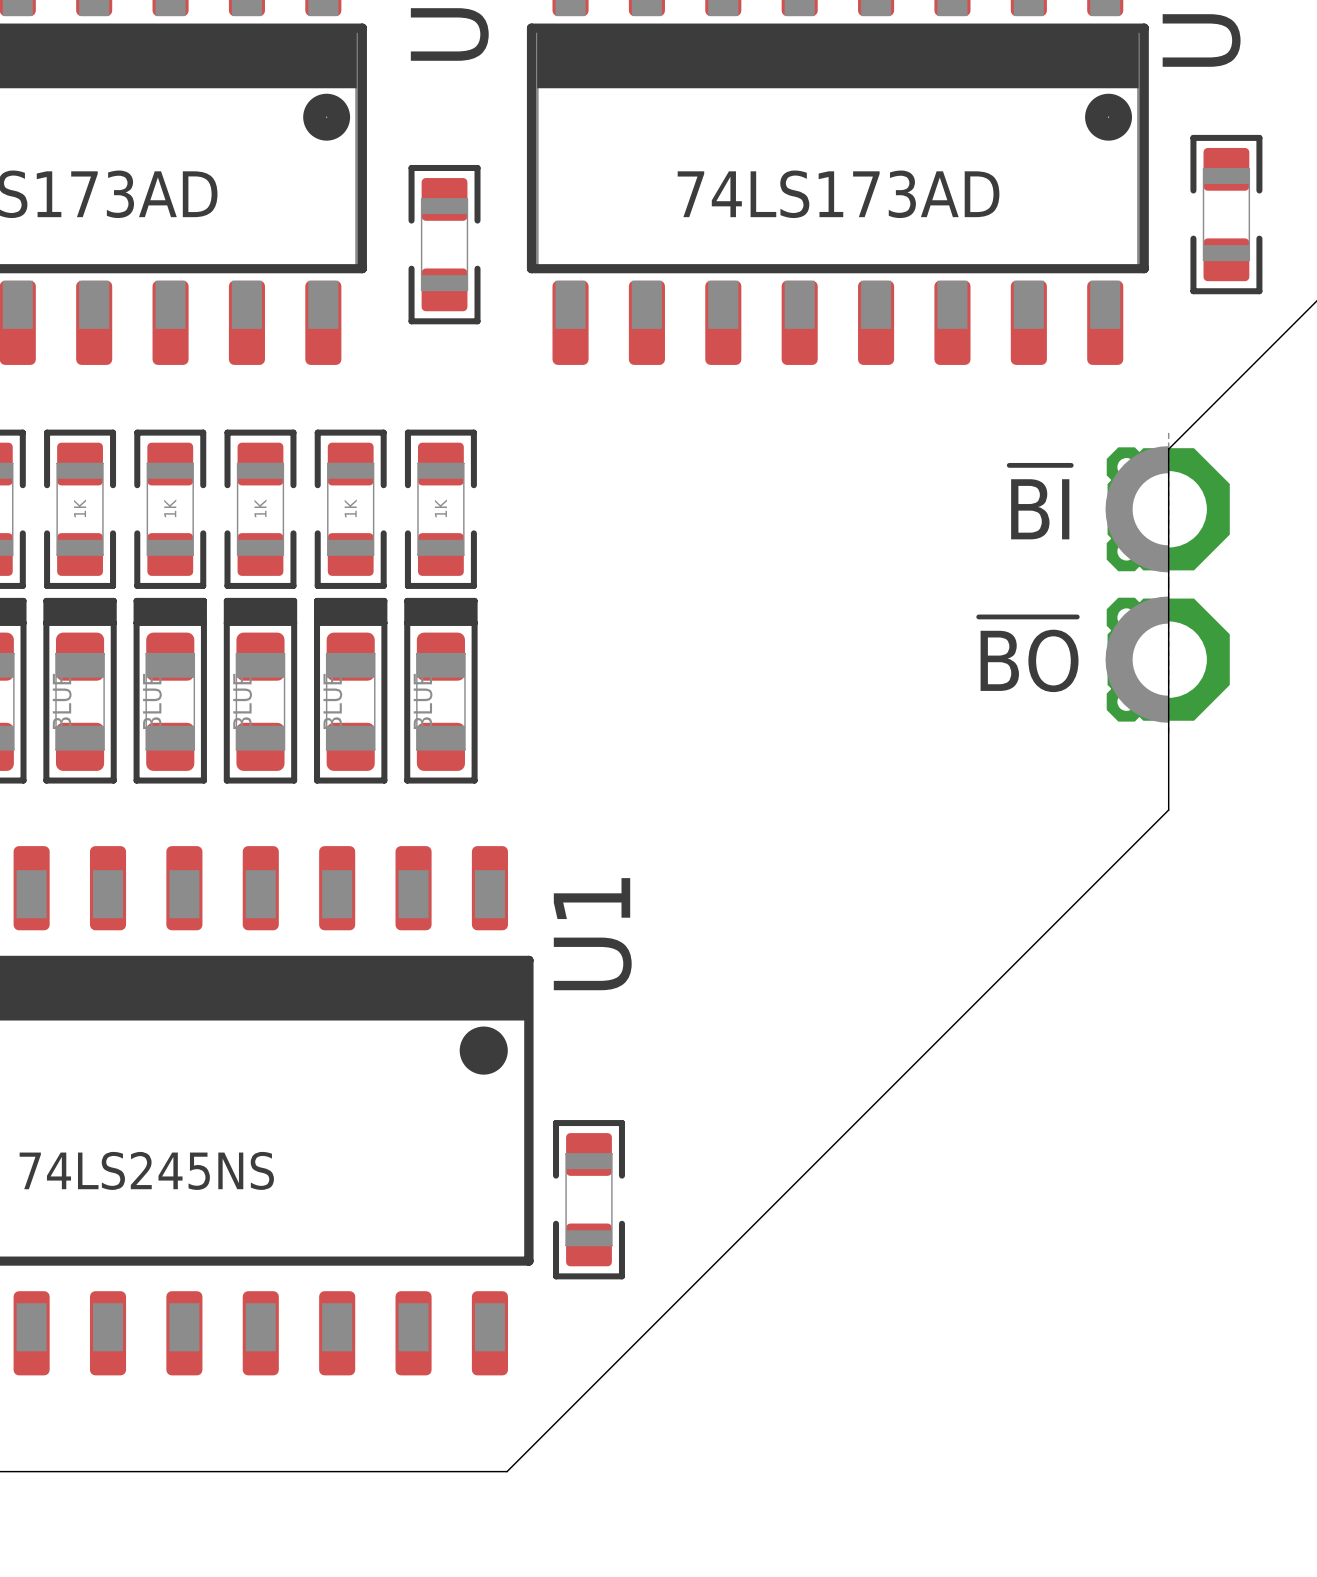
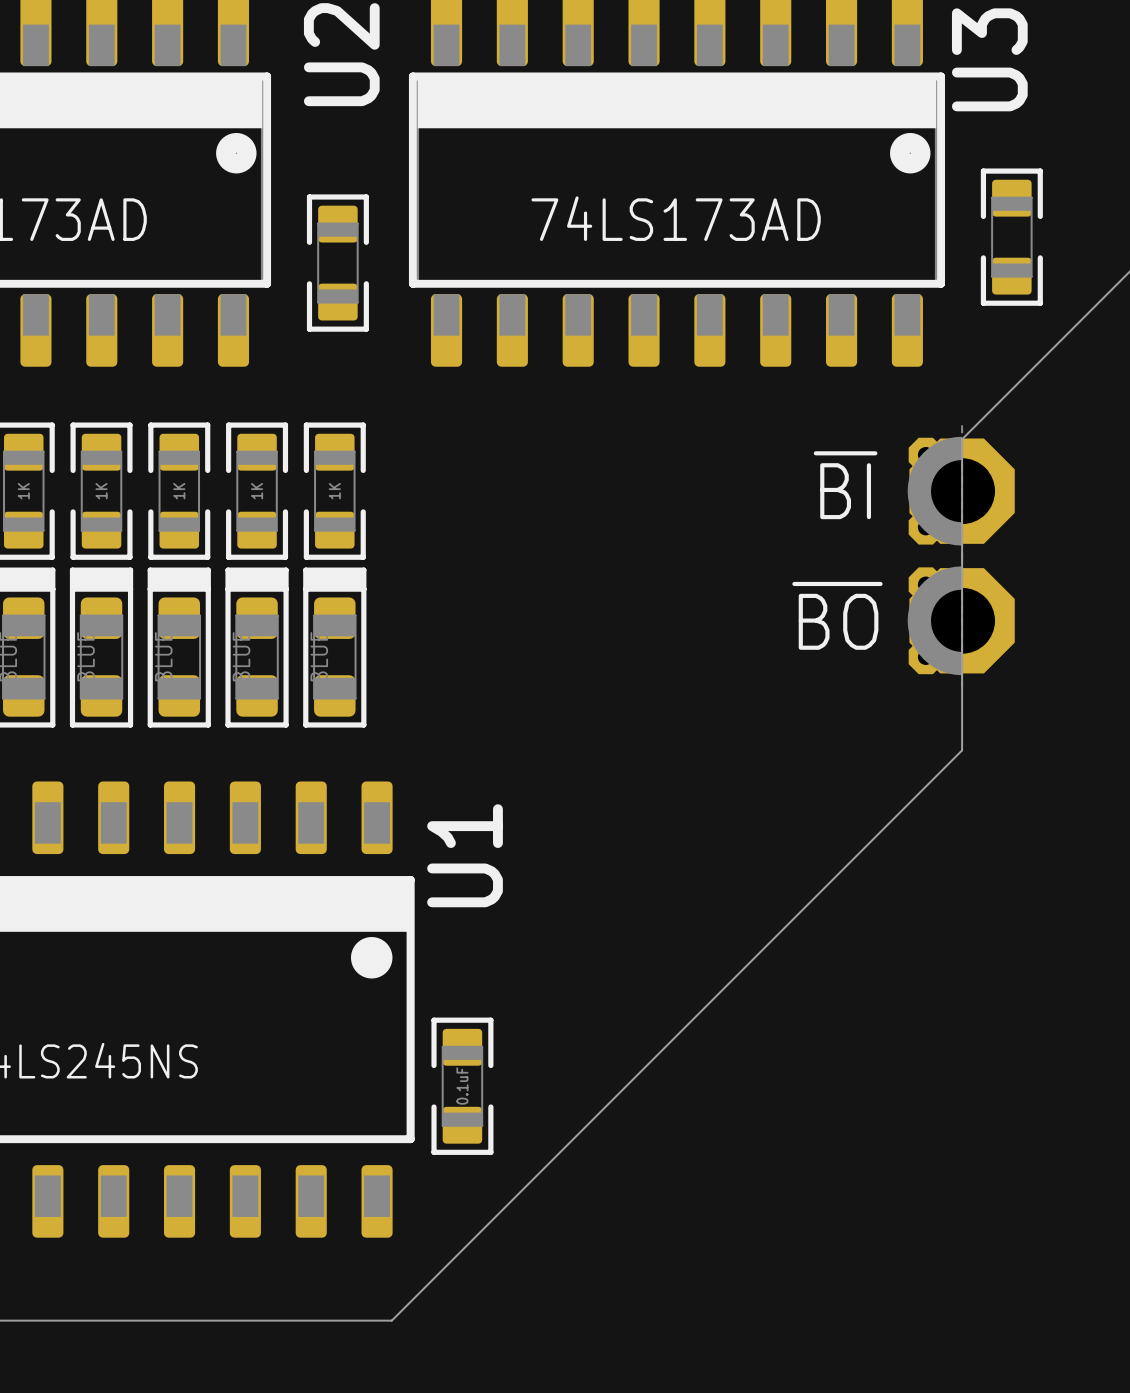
part value: none -> 0.1uF (462, 1086)

